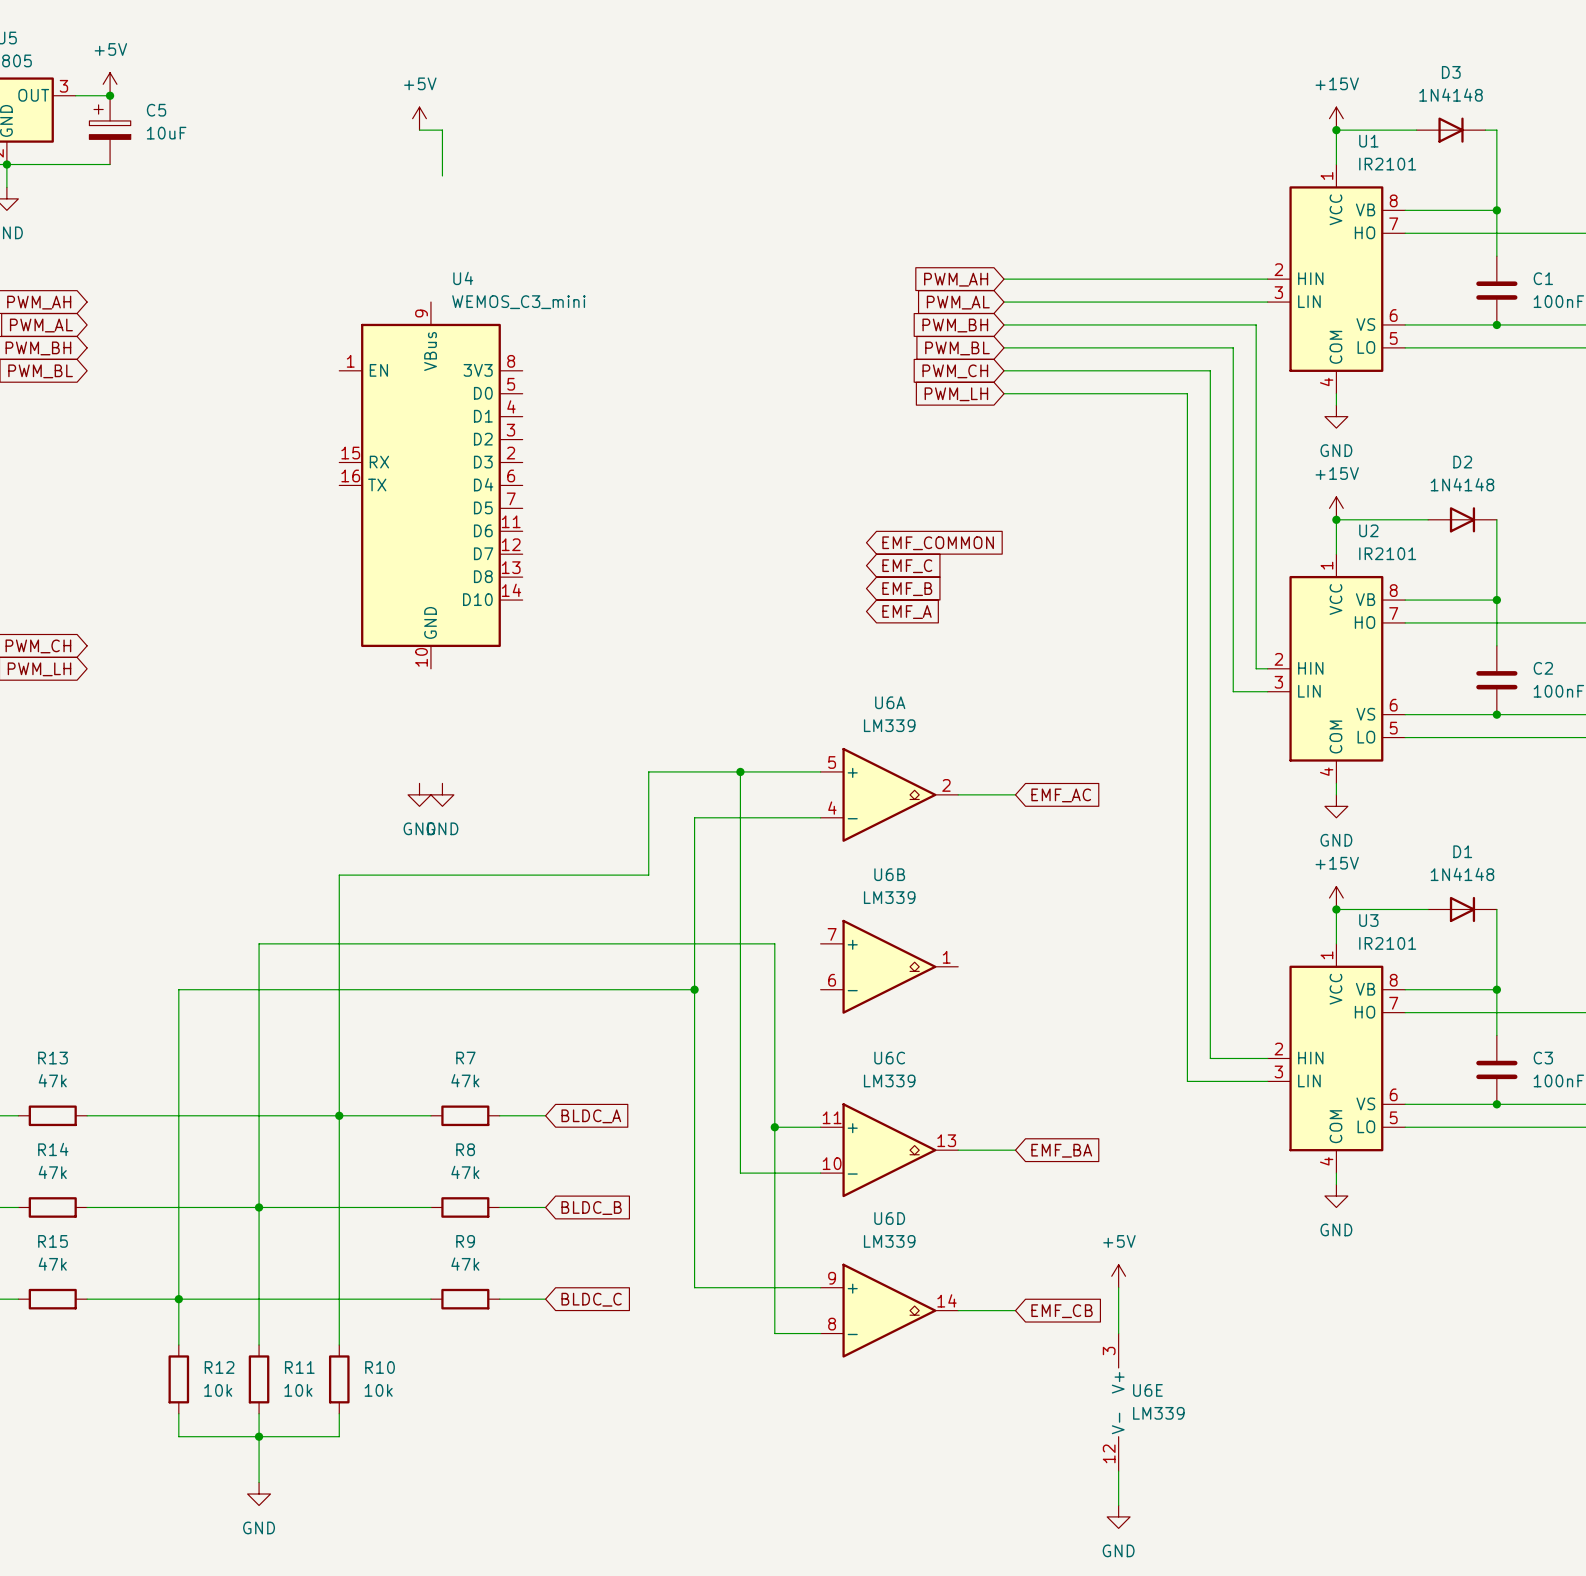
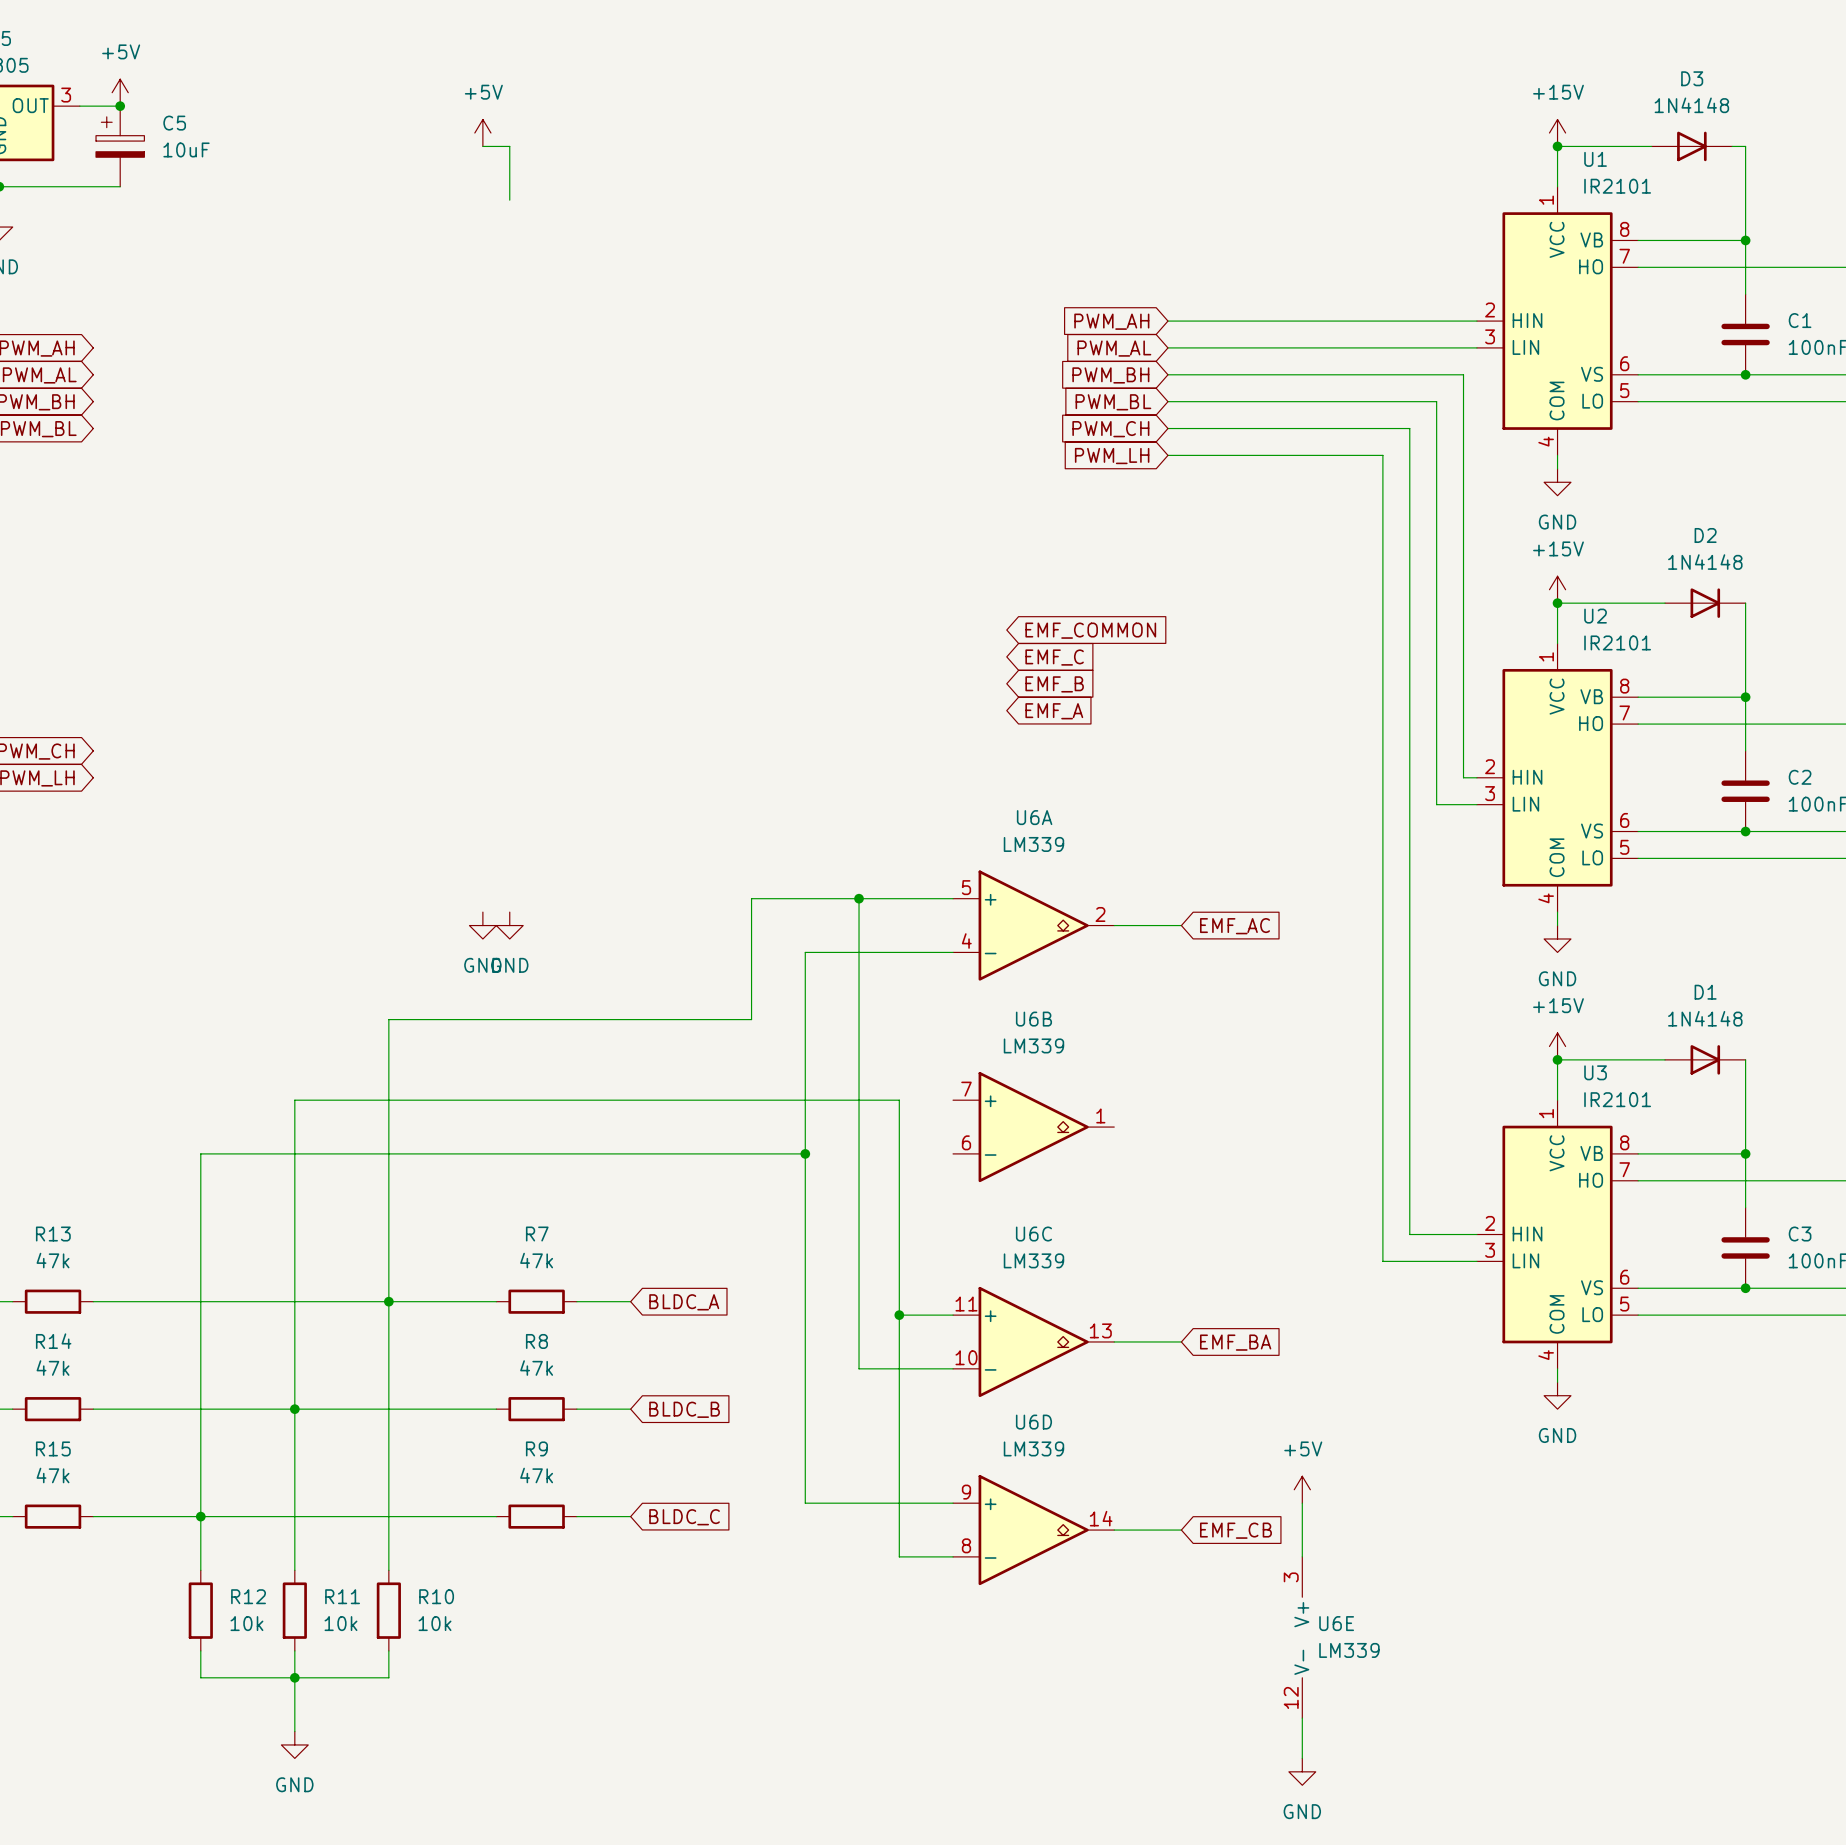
U4: WEMOS_C3_mini (430, 485) -> none

